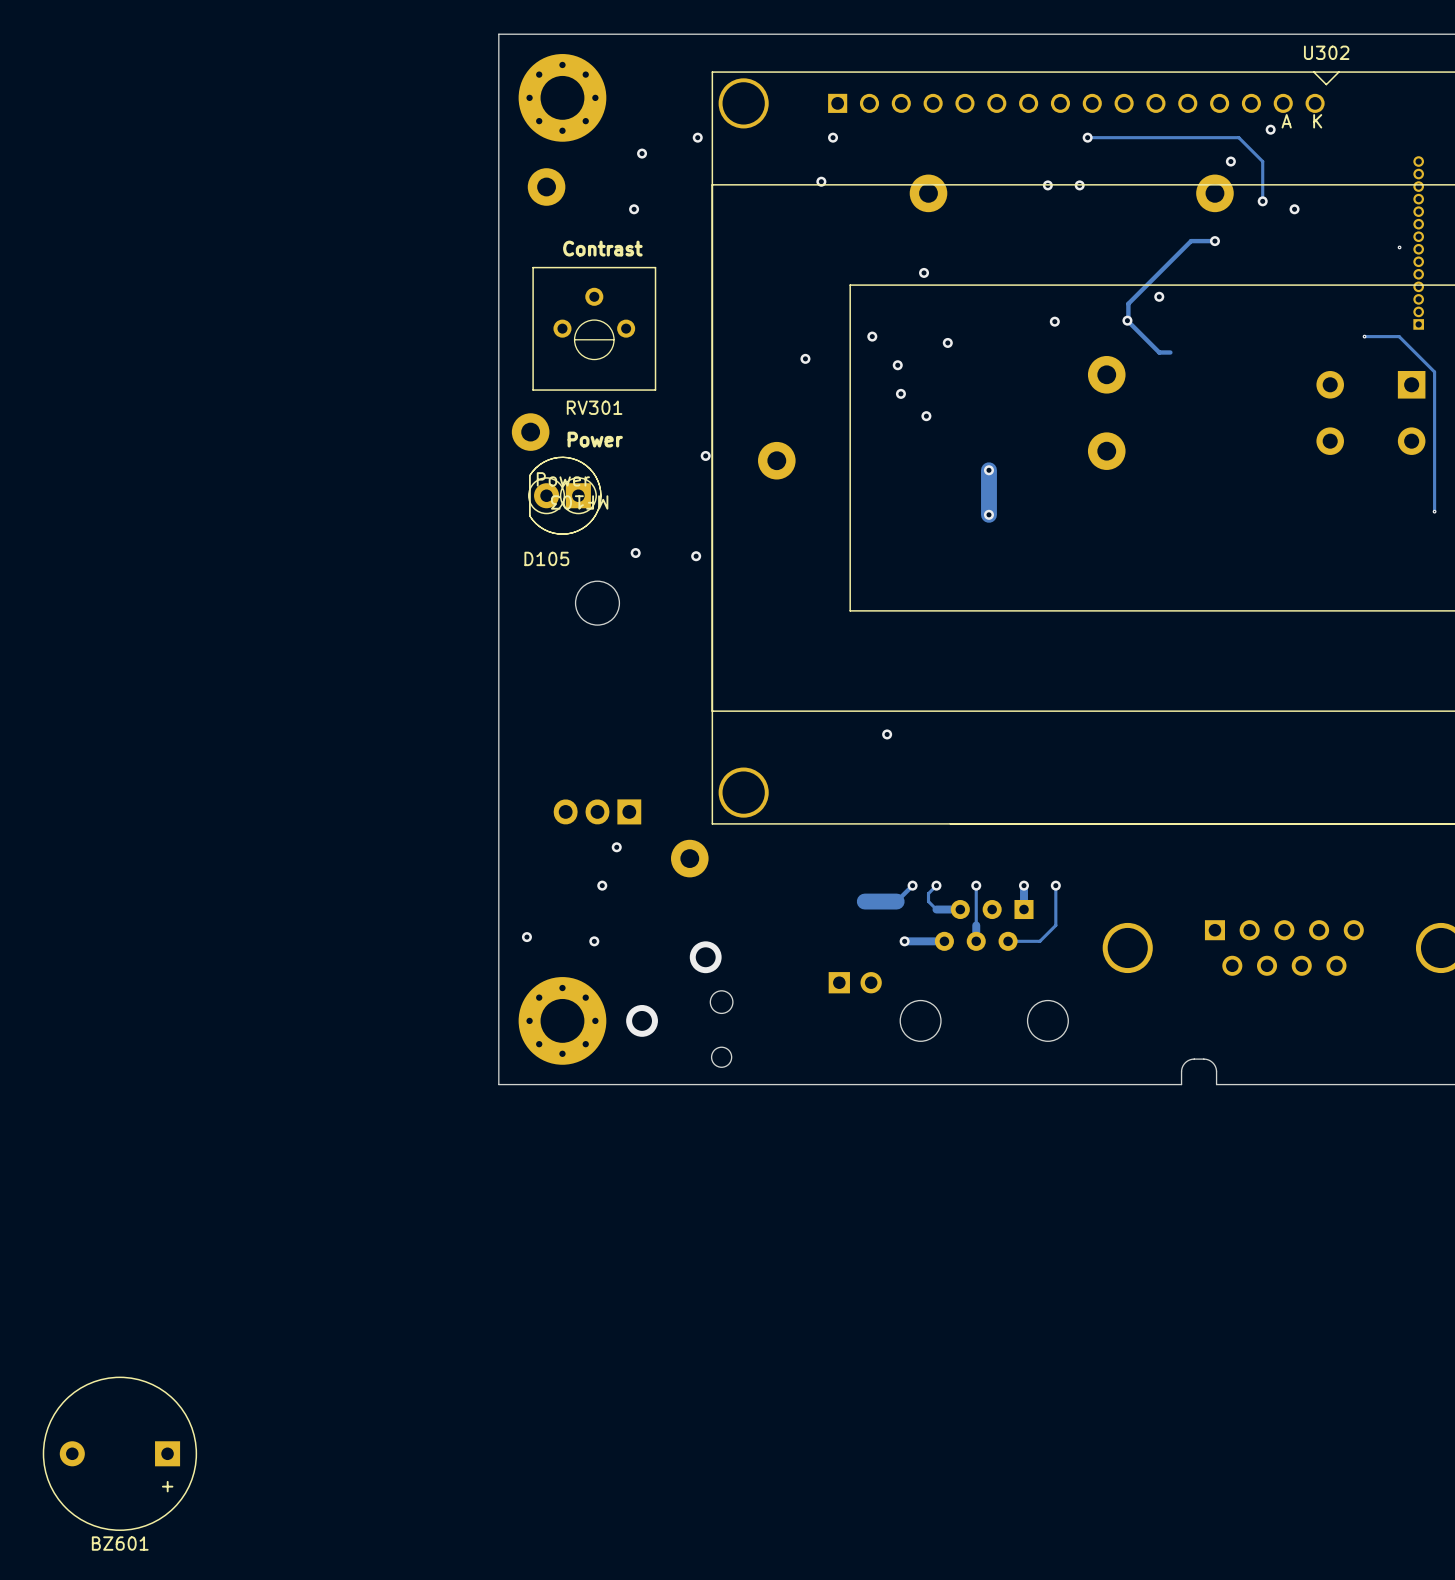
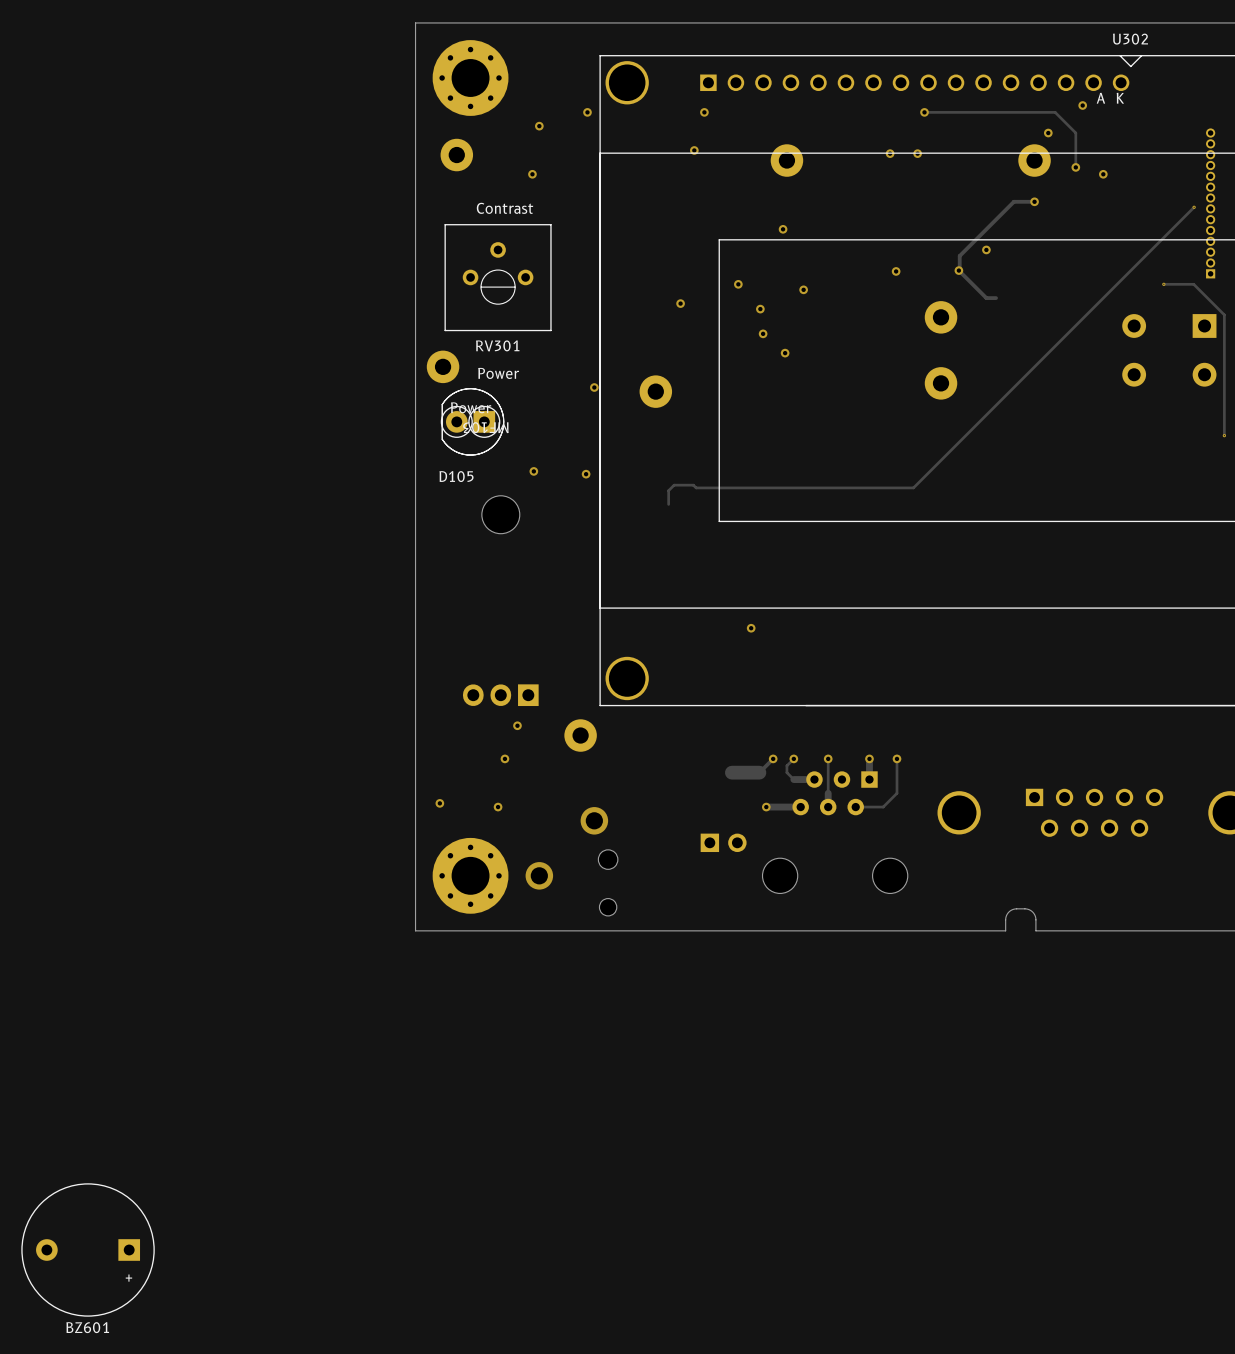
track: none -> (1194, 207) (913, 487) (696, 487) (693, 485) (674, 485) (668, 490) (668, 504)
track: (988, 470) (988, 514) -> none
via: (988, 470) -> none
via: (988, 514) -> none

